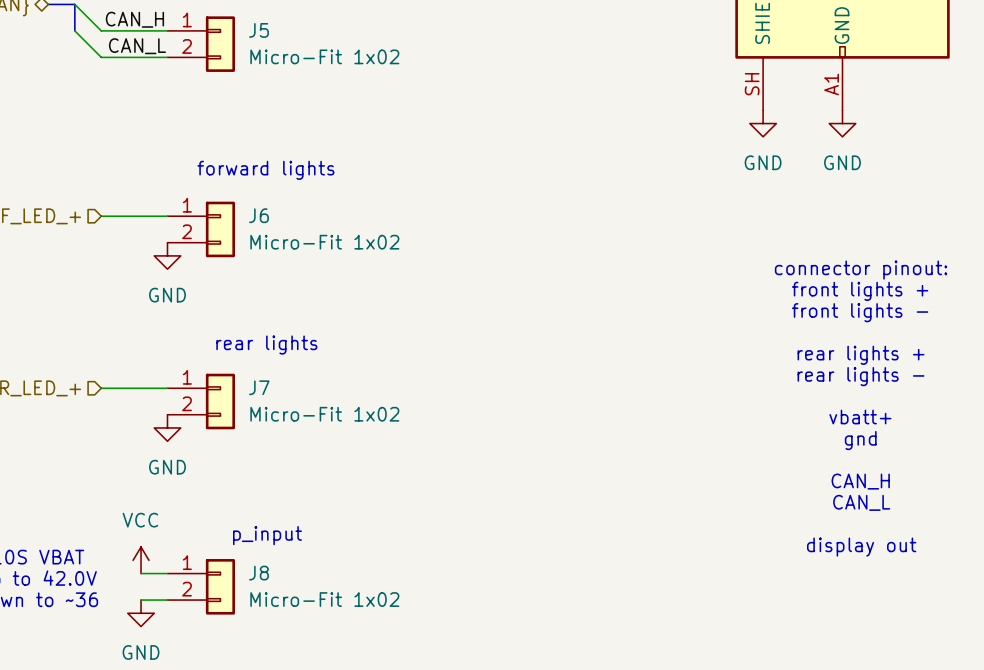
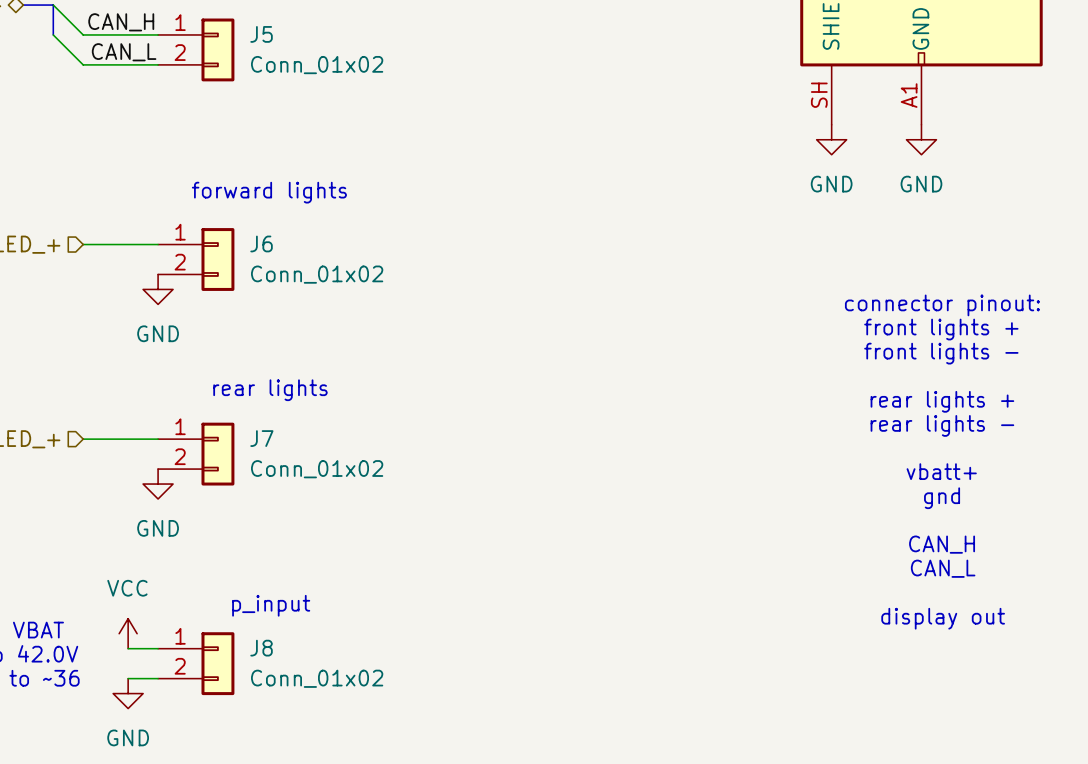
J5 value: Micro-Fit 1x02 (324, 56) -> Conn_01x02 (317, 65)
J6 value: Micro-Fit 1x02 (324, 242) -> Conn_01x02 (317, 274)
J7 value: Micro-Fit 1x02 (324, 414) -> Conn_01x02 (317, 469)
J8 value: Micro-Fit 1x02 (324, 599) -> Conn_01x02 (317, 678)

